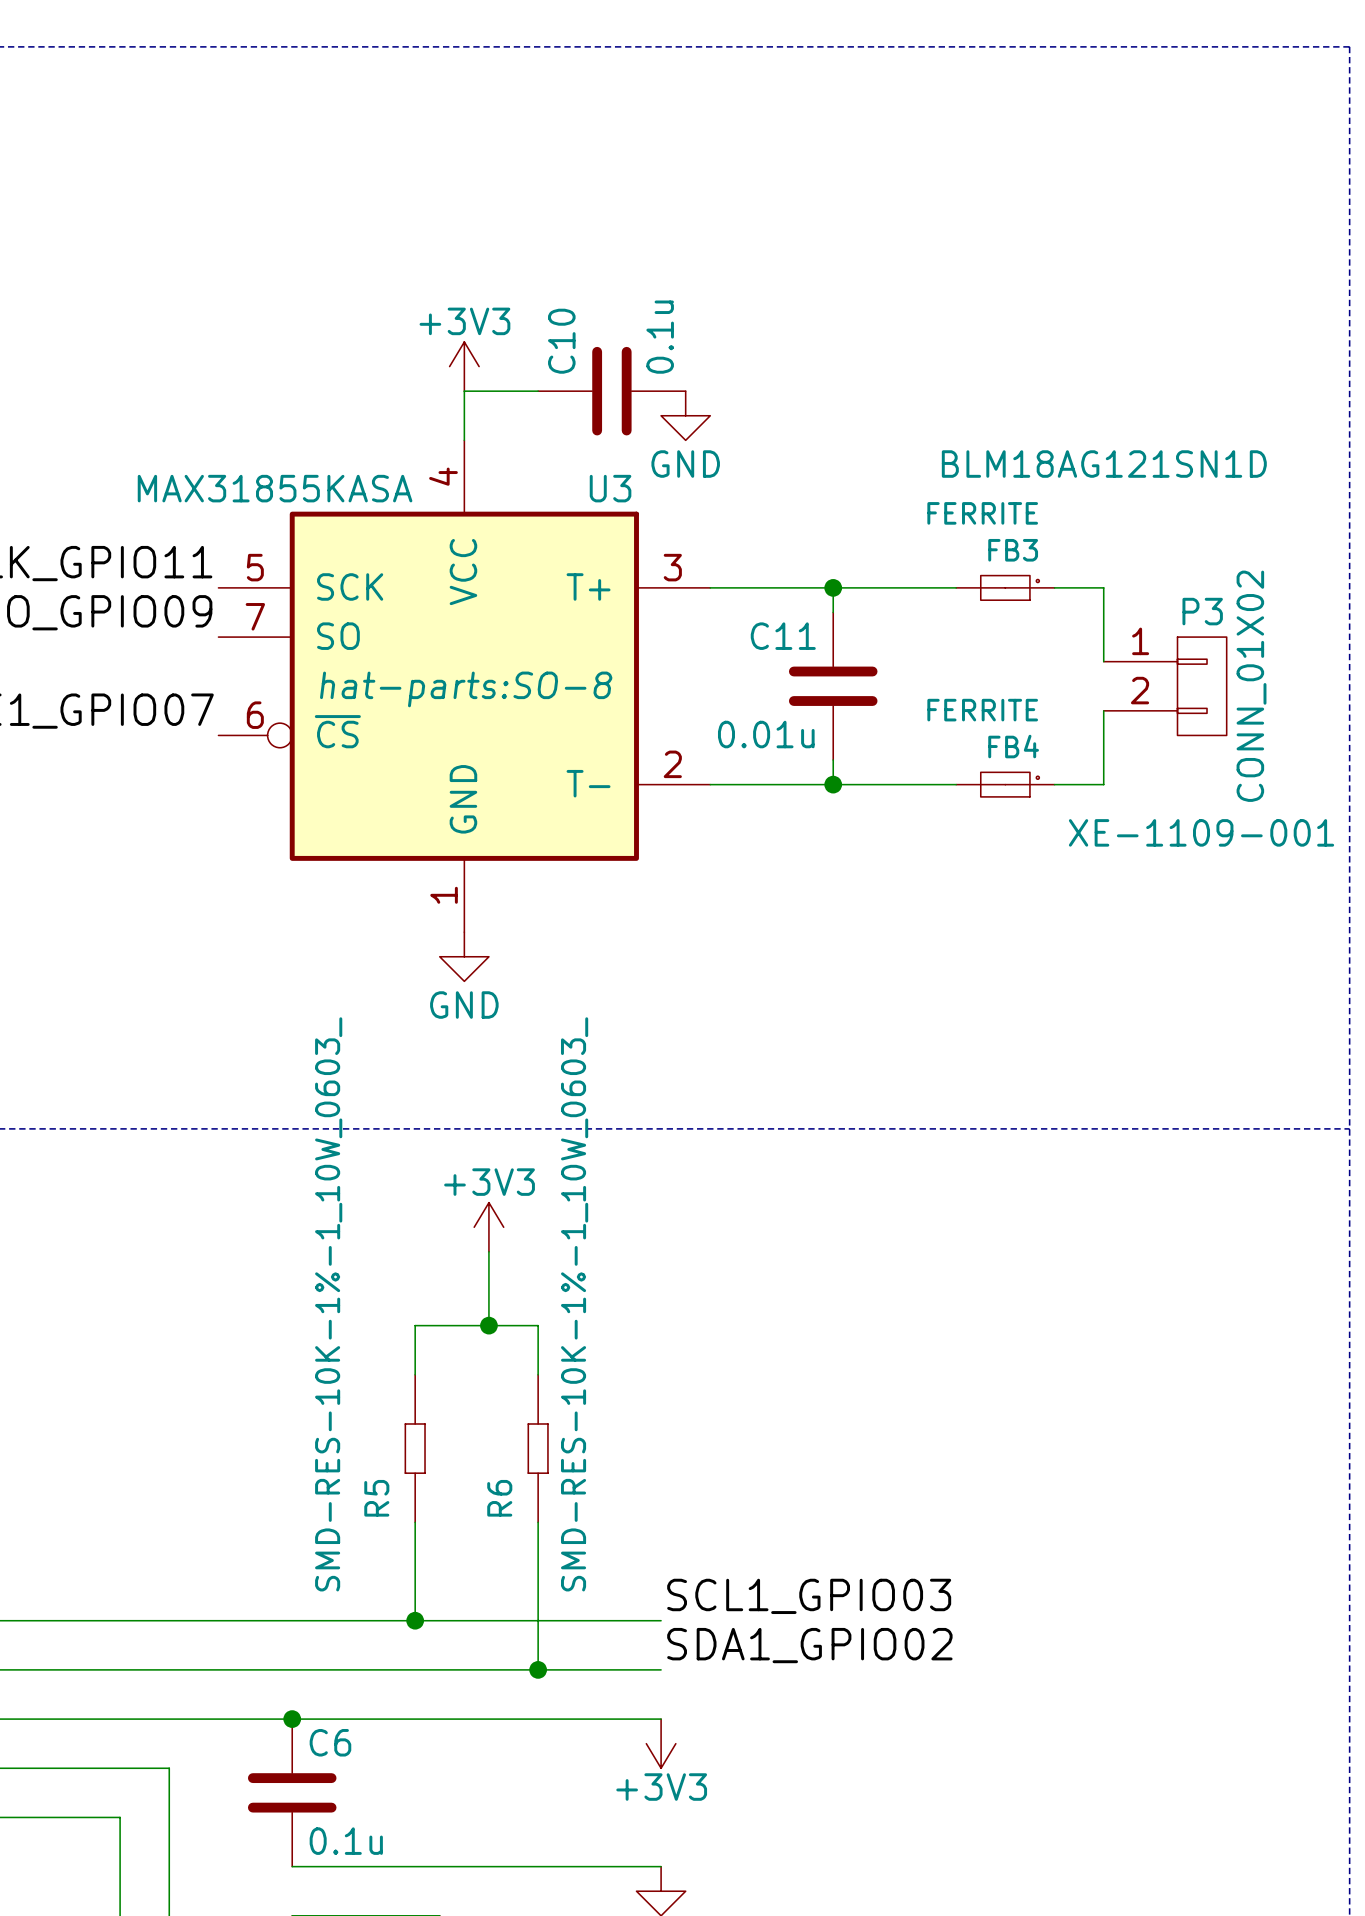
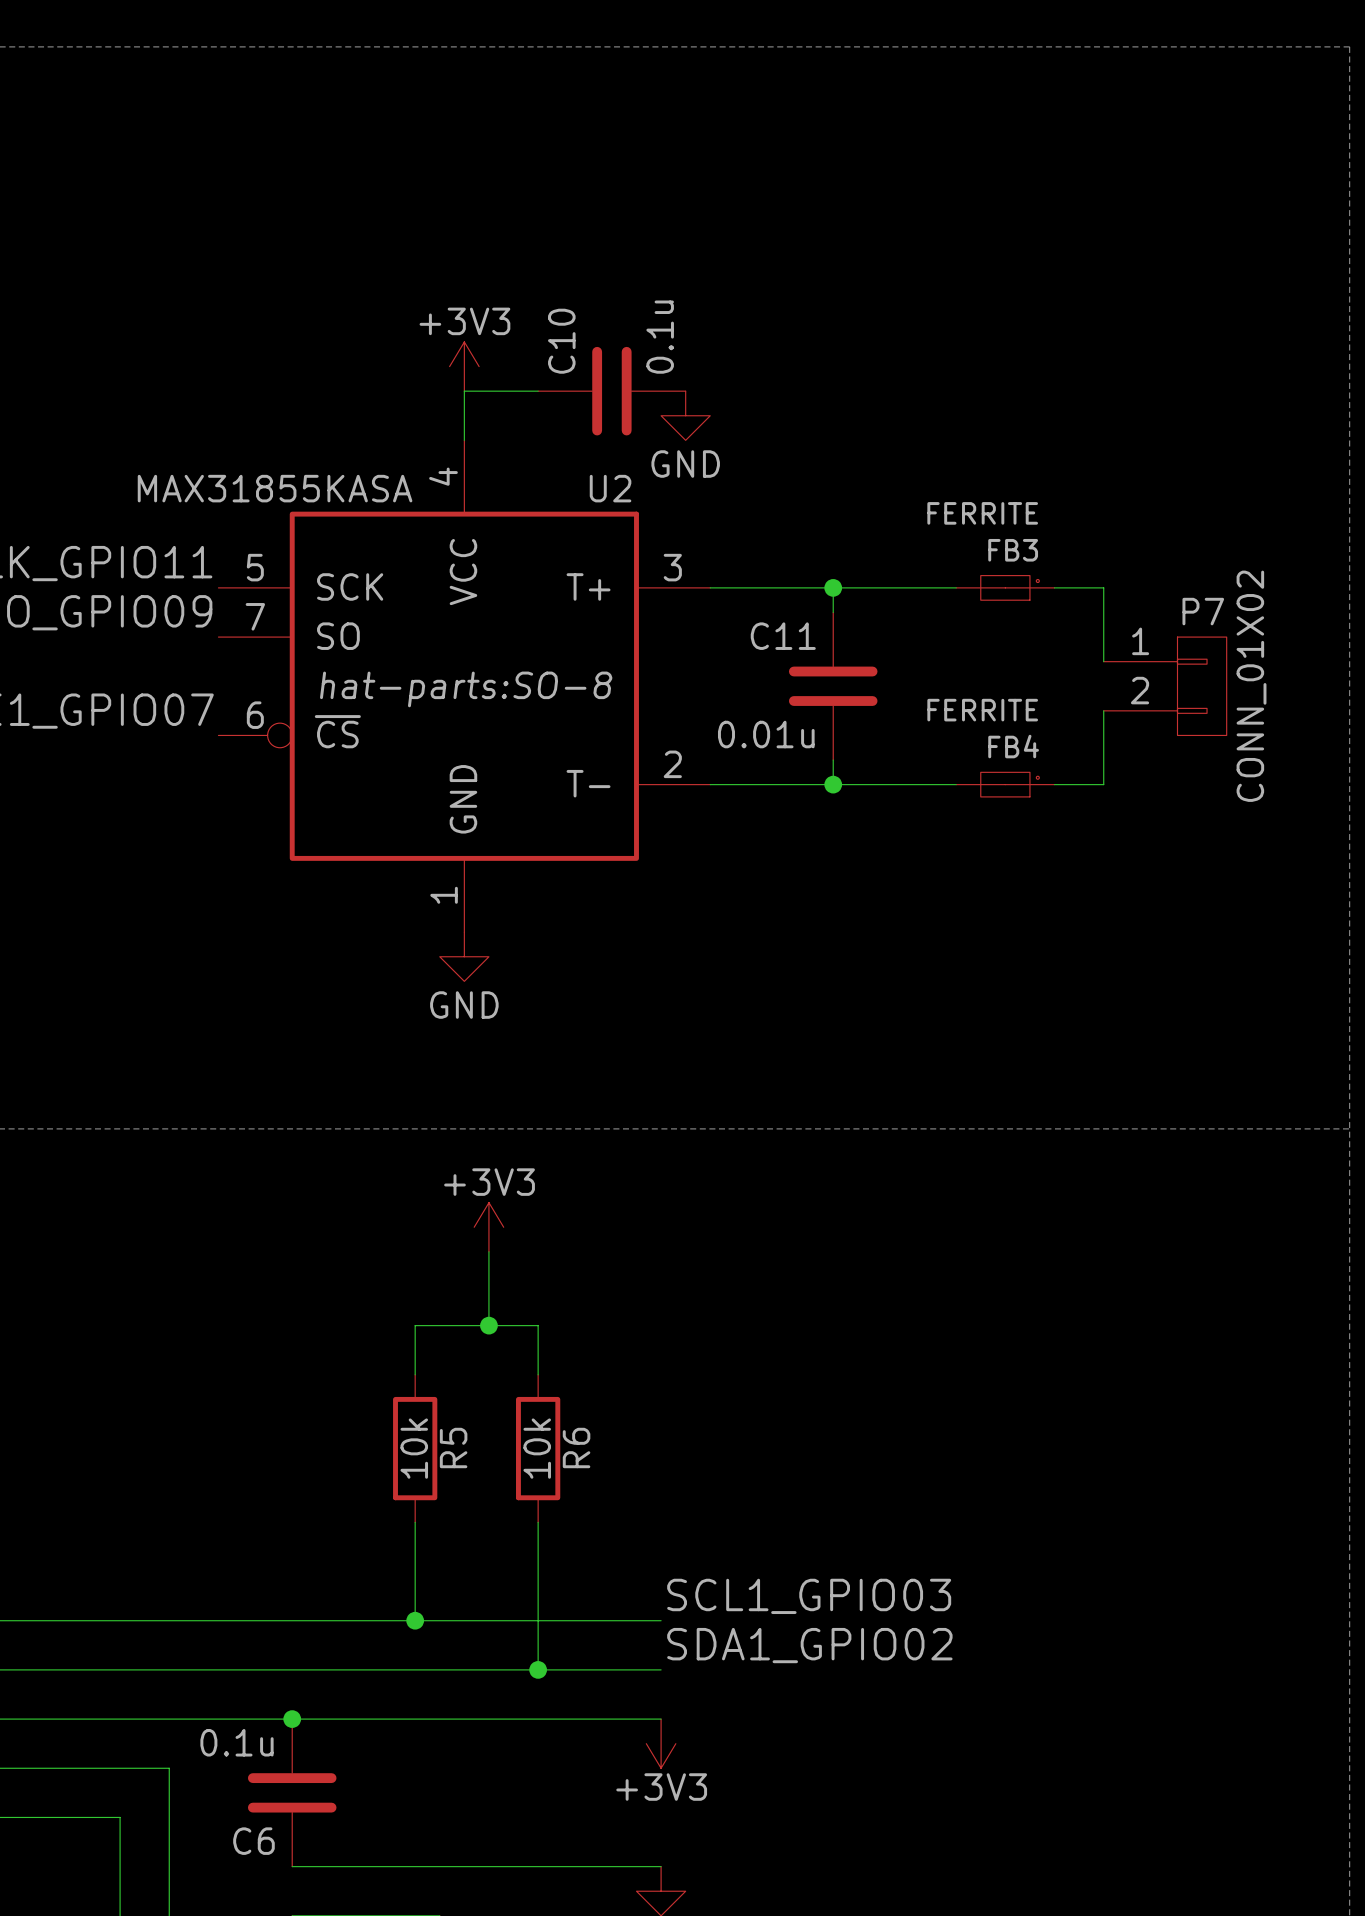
FB3 text: BLM18AG121SN1D (1104, 464) -> none
U3 name: U3 (610, 488) -> U2 (610, 488)
P3 name: P3 (1202, 611) -> P7 (1203, 611)
P3 text: XE-1109-001 (1201, 832) -> none
R5 value: SMD-RES-10K-1%-1_10W_0603_ (328, 1304) -> 10k (414, 1448)
R6 value: SMD-RES-10K-1%-1_10W_0603_ (574, 1304) -> 10k (537, 1448)
R5 symbol: [405, 1374, 426, 1523] -> [393, 1374, 438, 1523]
R6 symbol: [528, 1374, 548, 1523] -> [516, 1374, 561, 1523]
R5 name position: R5 (376, 1498) -> R5 (453, 1448)
R6 name position: R6 (499, 1498) -> R6 (576, 1448)
C6 name position: C6 (330, 1742) -> C6 (253, 1841)
C6 value position: 0.1u (346, 1841) -> 0.1u (237, 1742)

